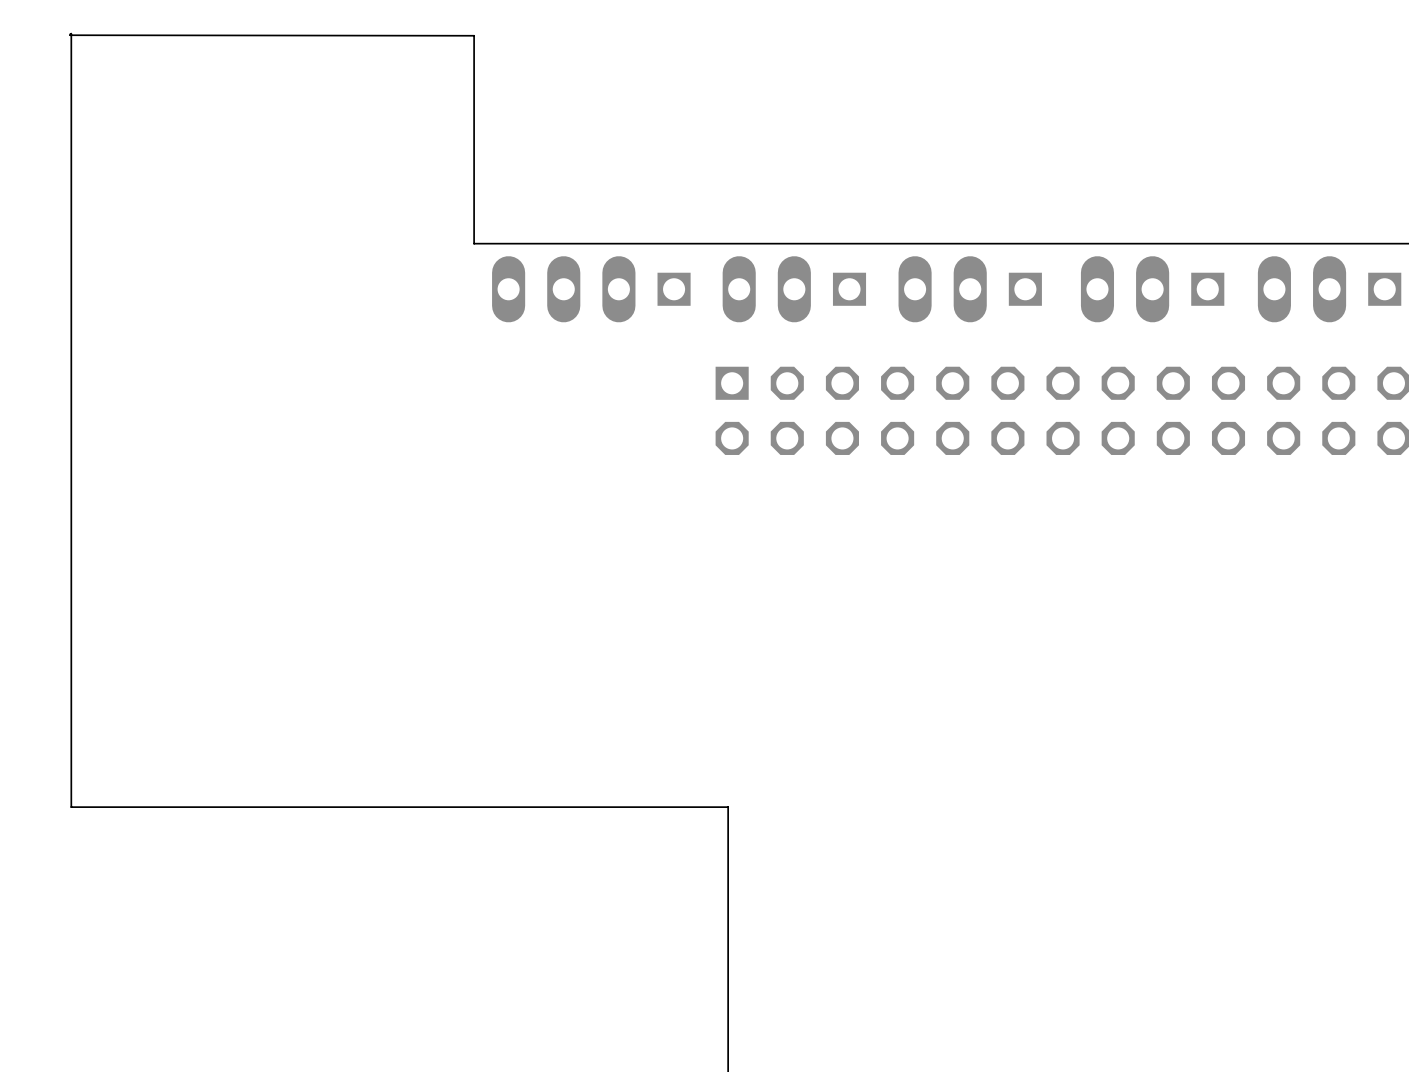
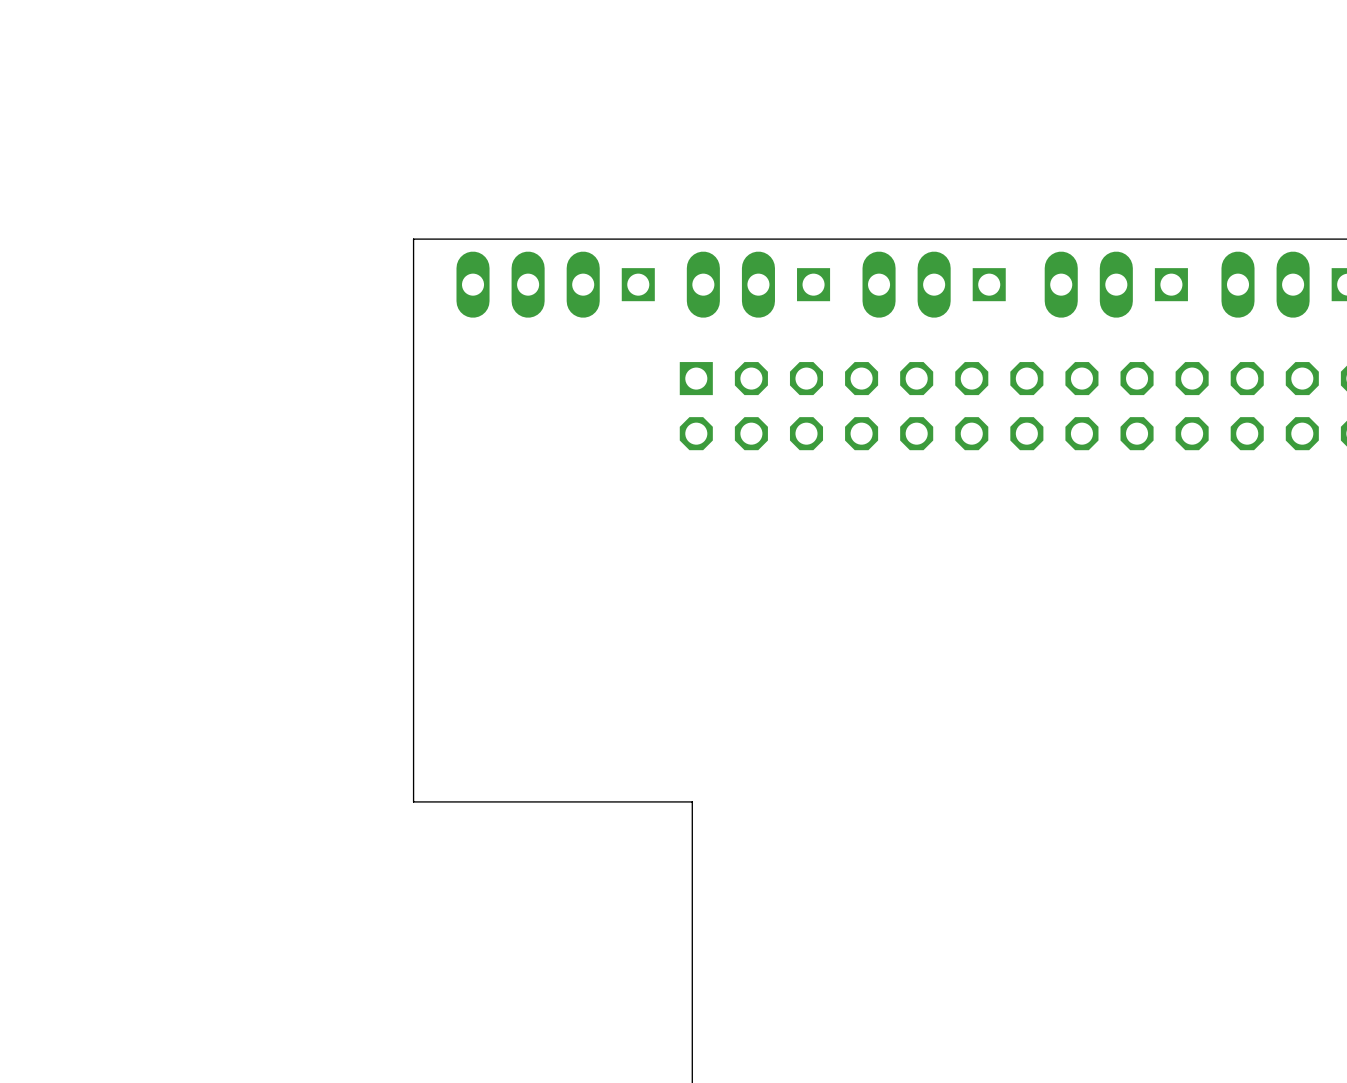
board edge: (71, 33) (71, 807) (449, 807) -> (438, 239) (413, 239) (413, 801)
board edge: (70, 34) (474, 35) (474, 243) -> none

